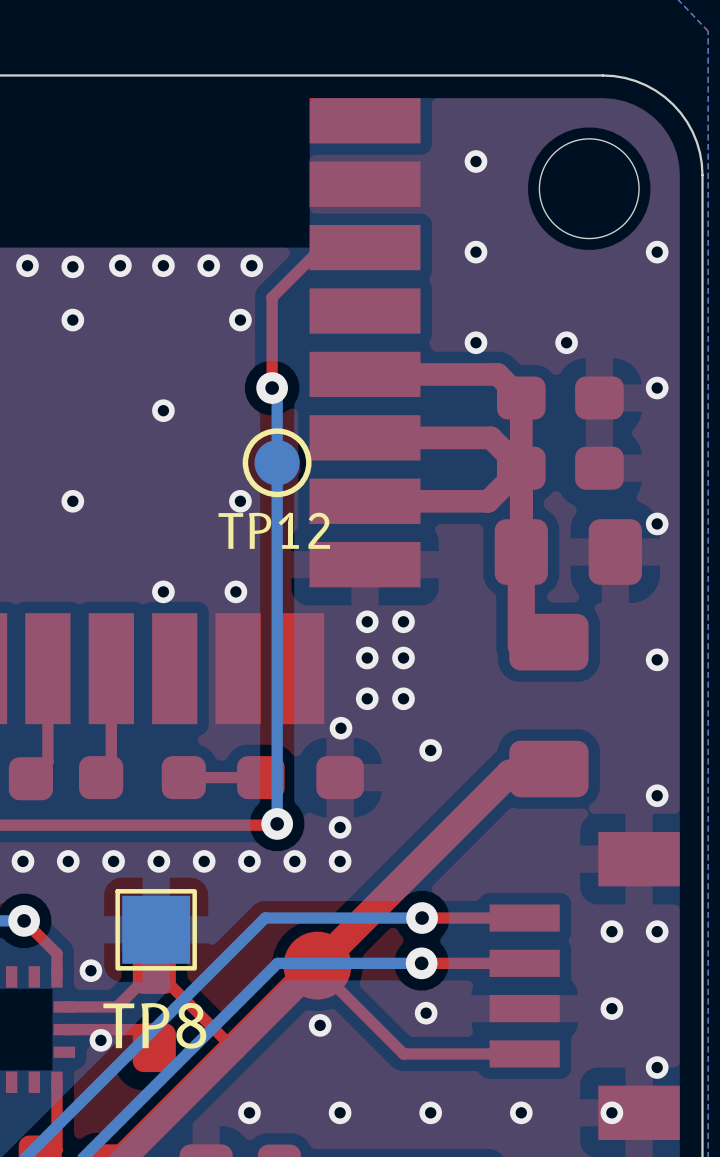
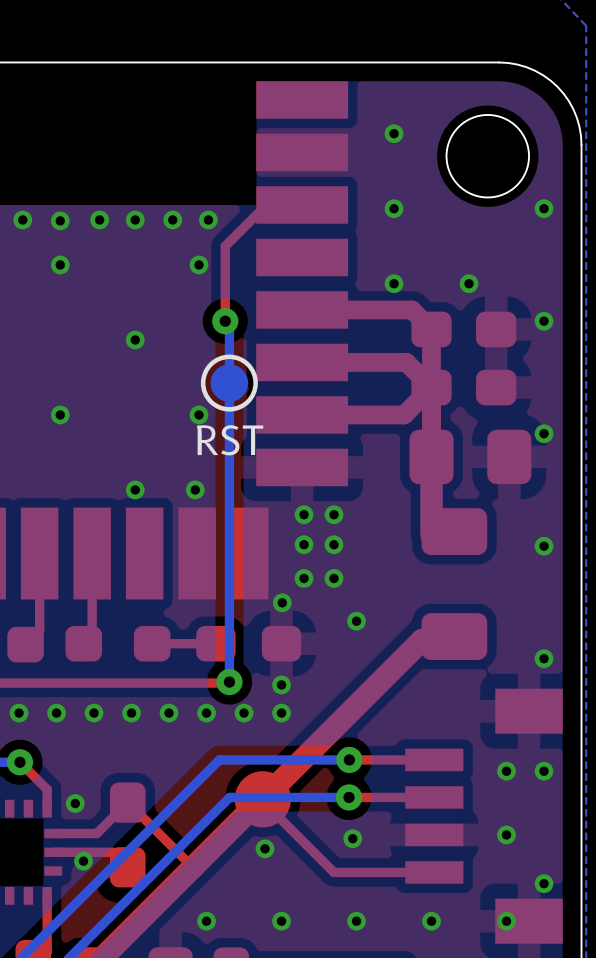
TP12 name: TP12 (274, 530) -> none
TP12 value: none -> RST (230, 440)
TP8: (156, 929) -> none

